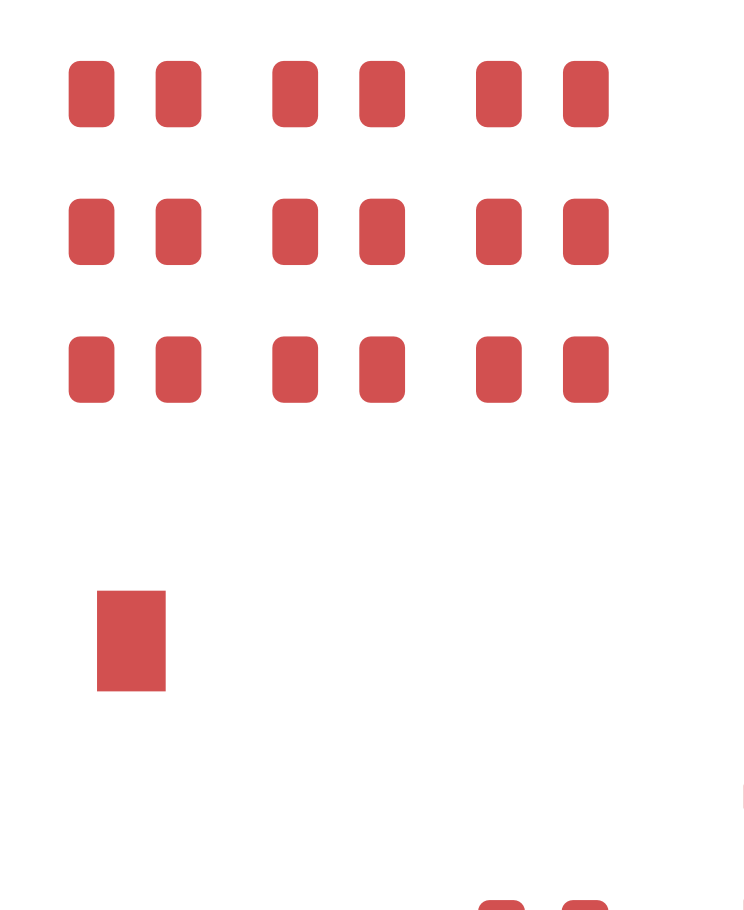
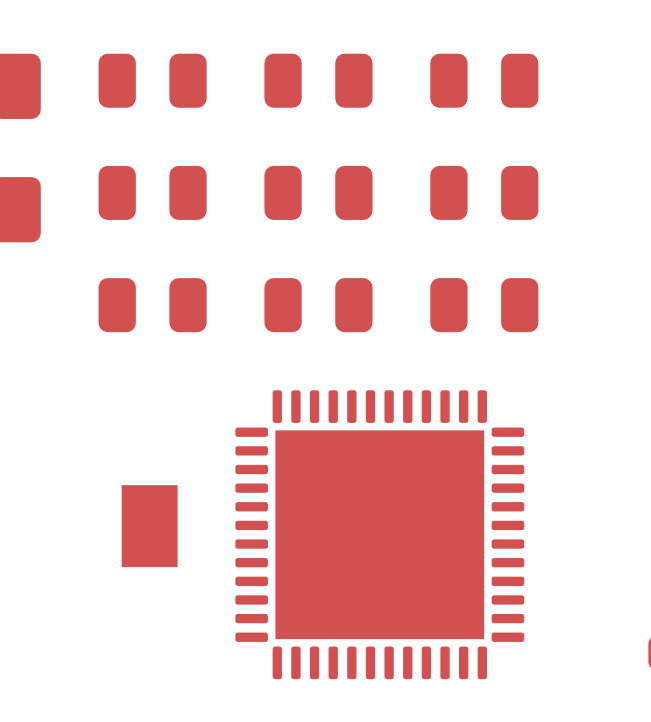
part: none -> (379, 534)

